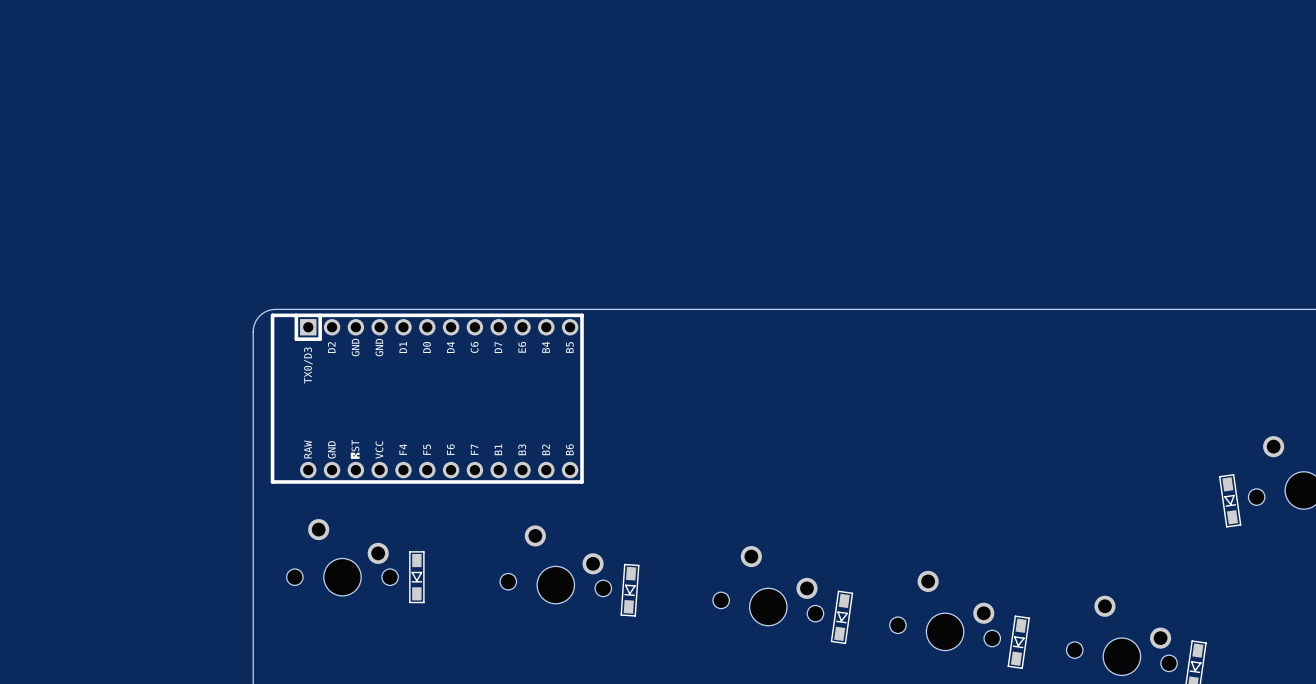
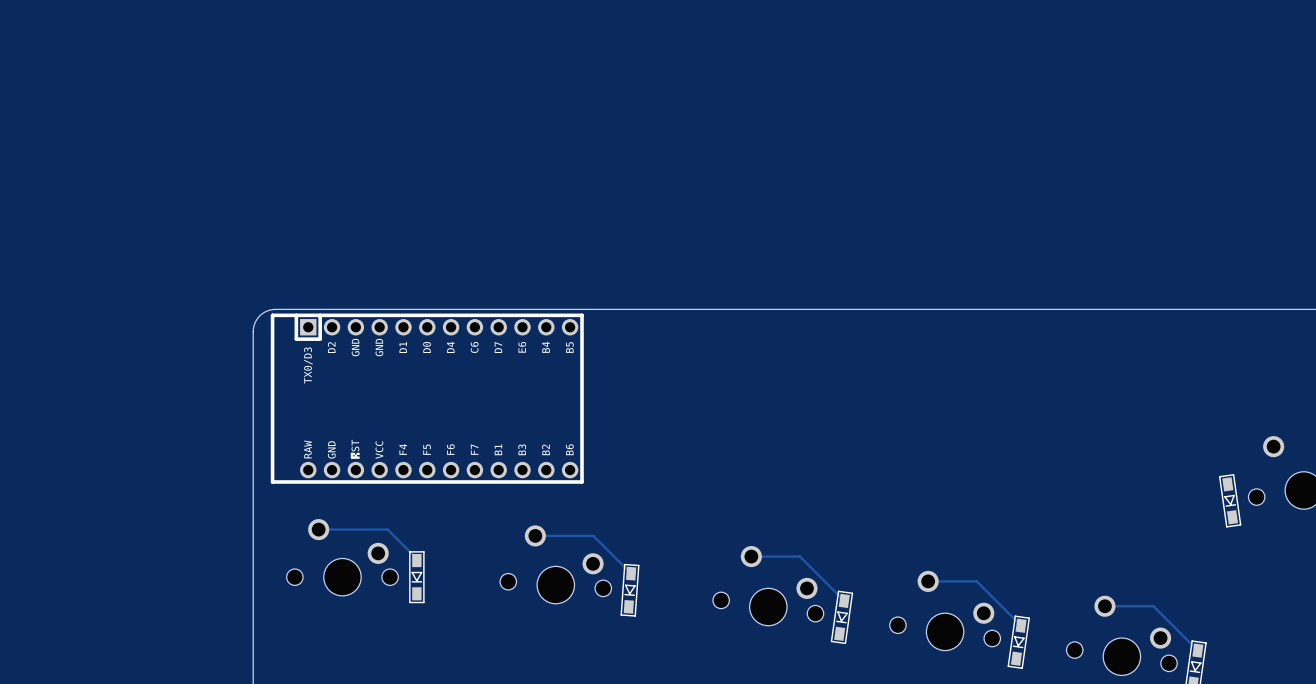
track: none -> (318, 529) (387, 529) (416, 560)
track: none -> (535, 535) (593, 535) (631, 573)
track: none -> (751, 556) (799, 556) (844, 600)
track: none -> (928, 581) (976, 581) (1021, 625)
track: none -> (1104, 606) (1153, 606) (1197, 650)

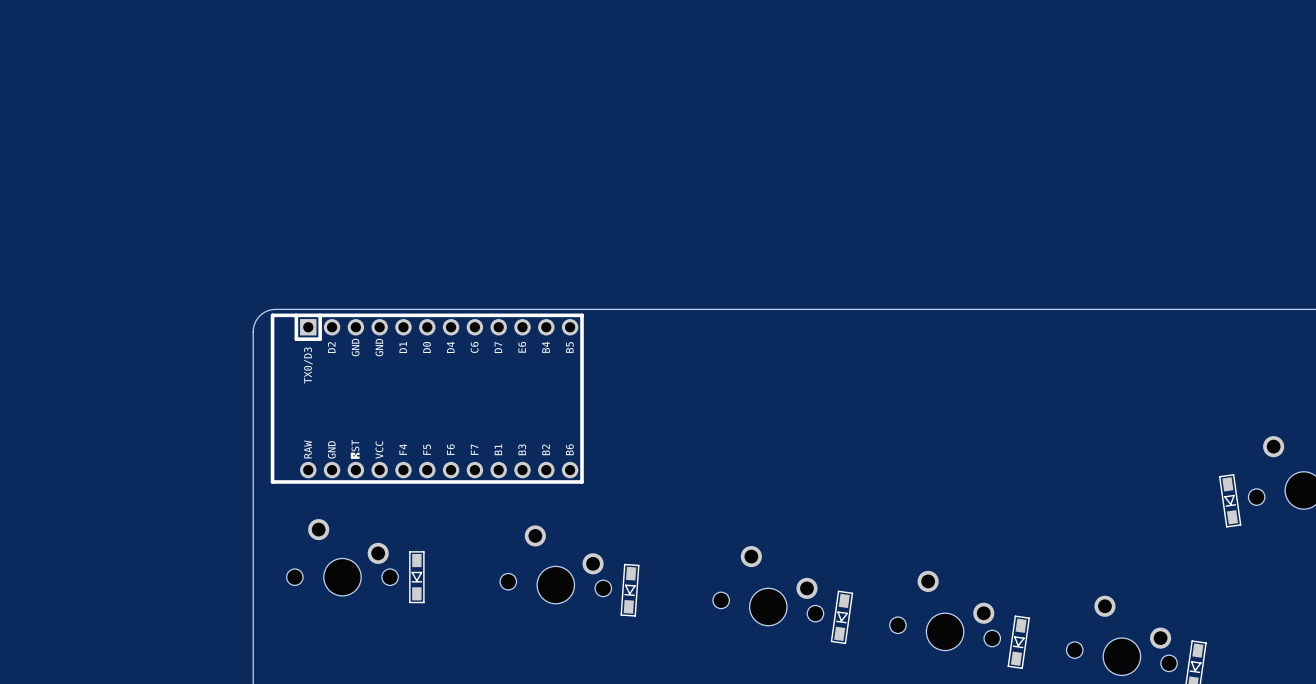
track: (318, 529) (387, 529) (416, 560) -> none
track: (535, 535) (593, 535) (631, 573) -> none
track: (751, 556) (799, 556) (844, 600) -> none
track: (928, 581) (976, 581) (1021, 625) -> none
track: (1104, 606) (1153, 606) (1197, 650) -> none

